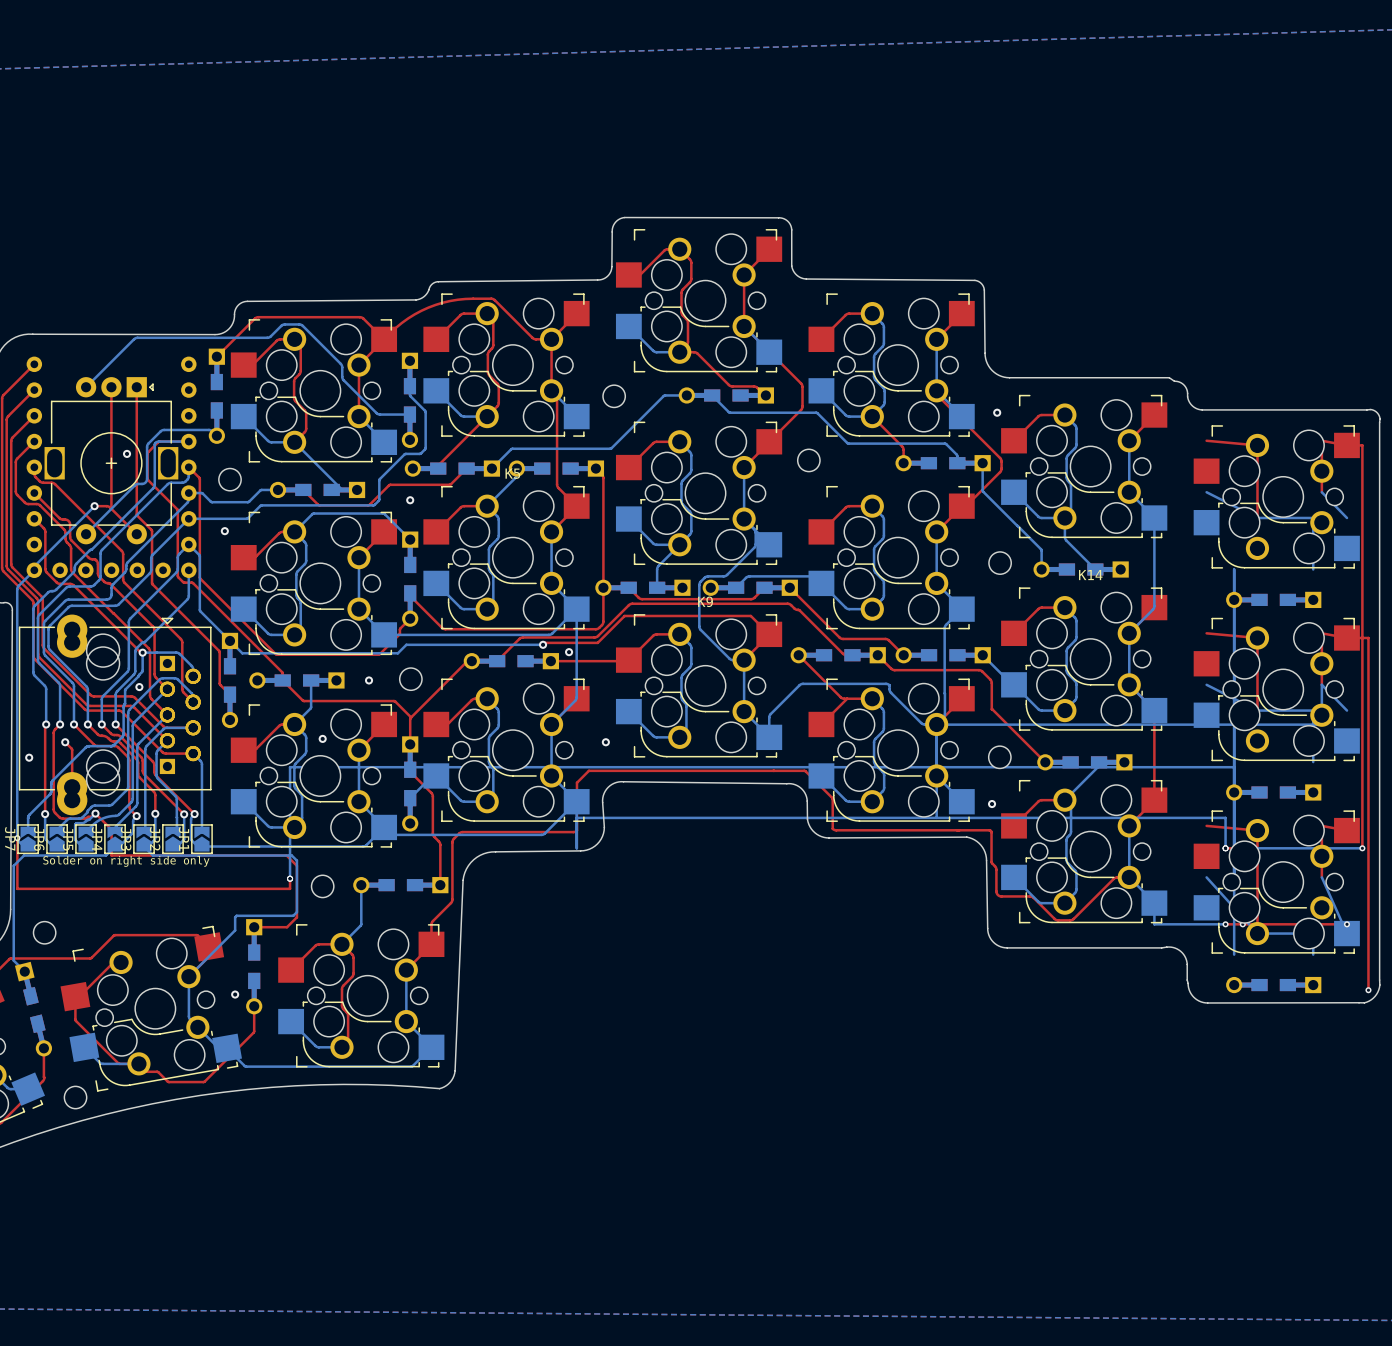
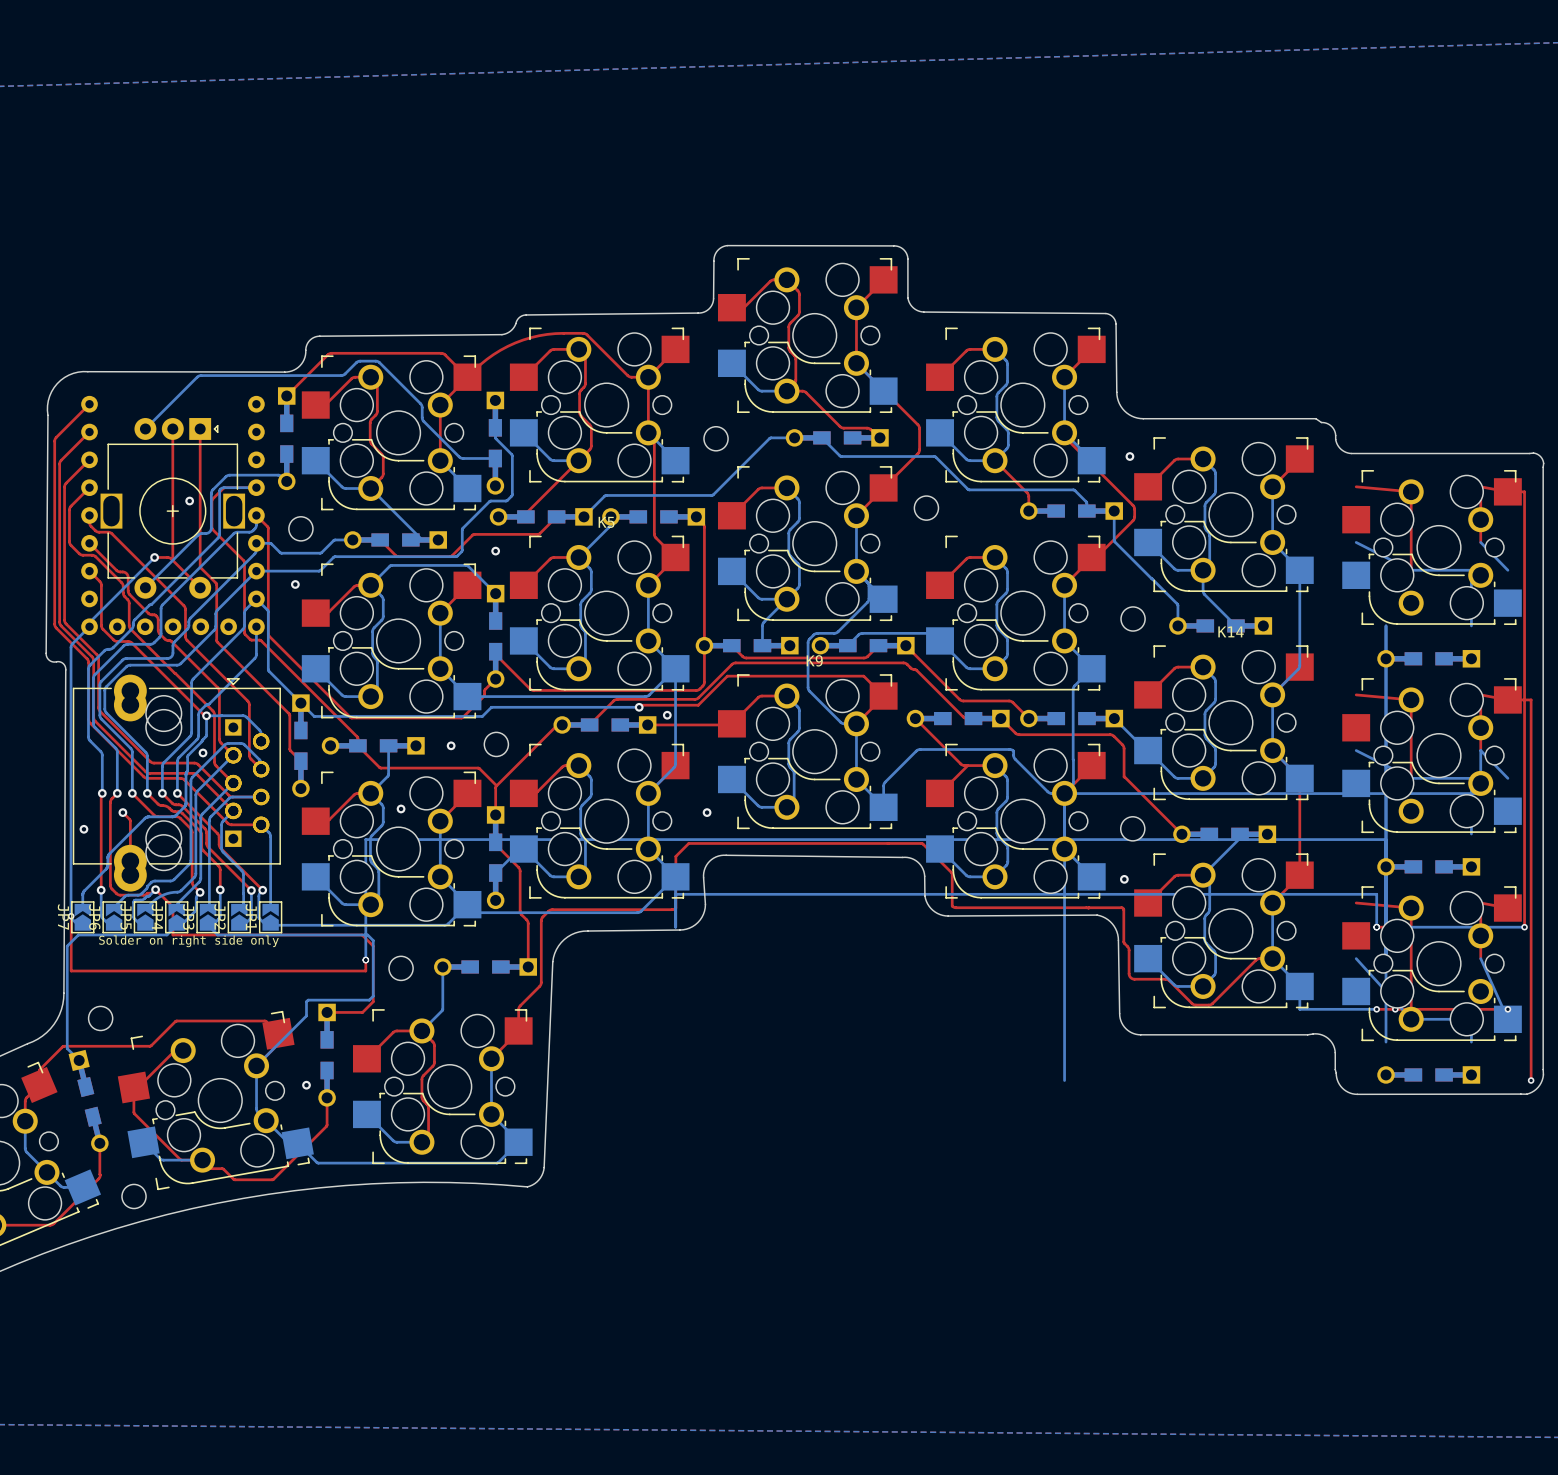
bottom track: none -> (1064, 894) (1064, 1080)

